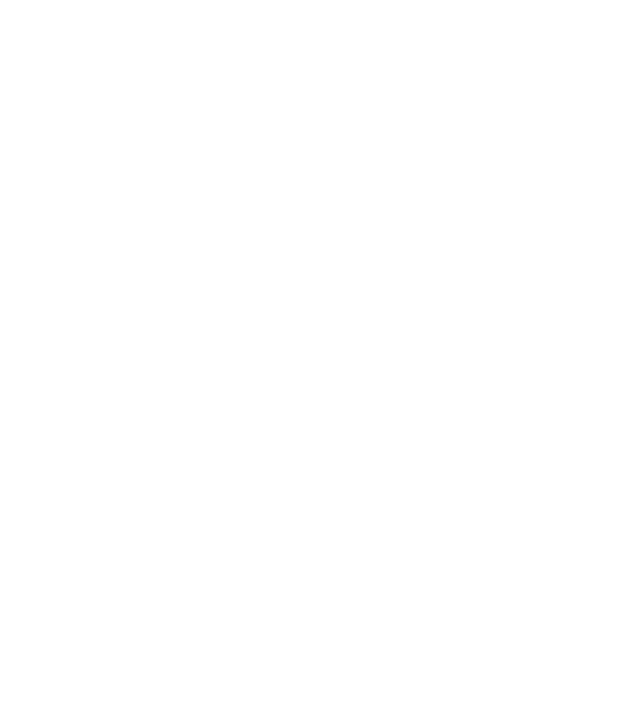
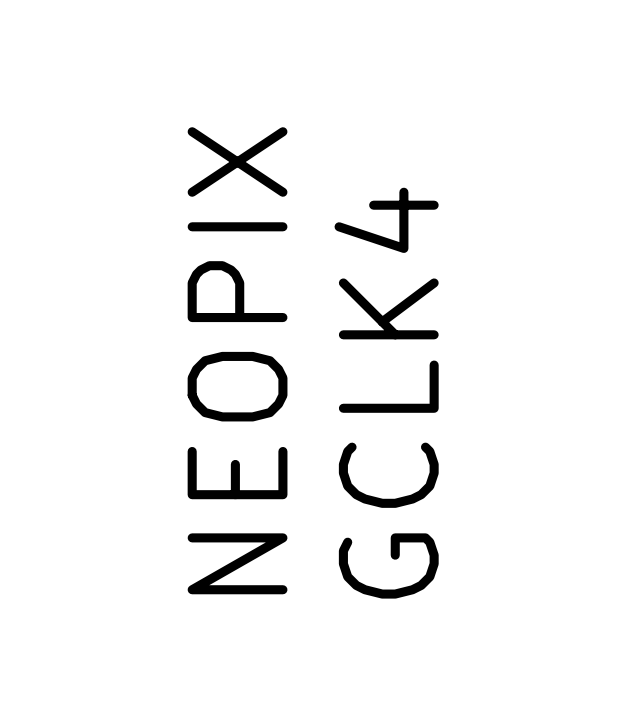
label: none -> NEOPIX (237, 360)
label: none -> GCLK4 (386, 393)

